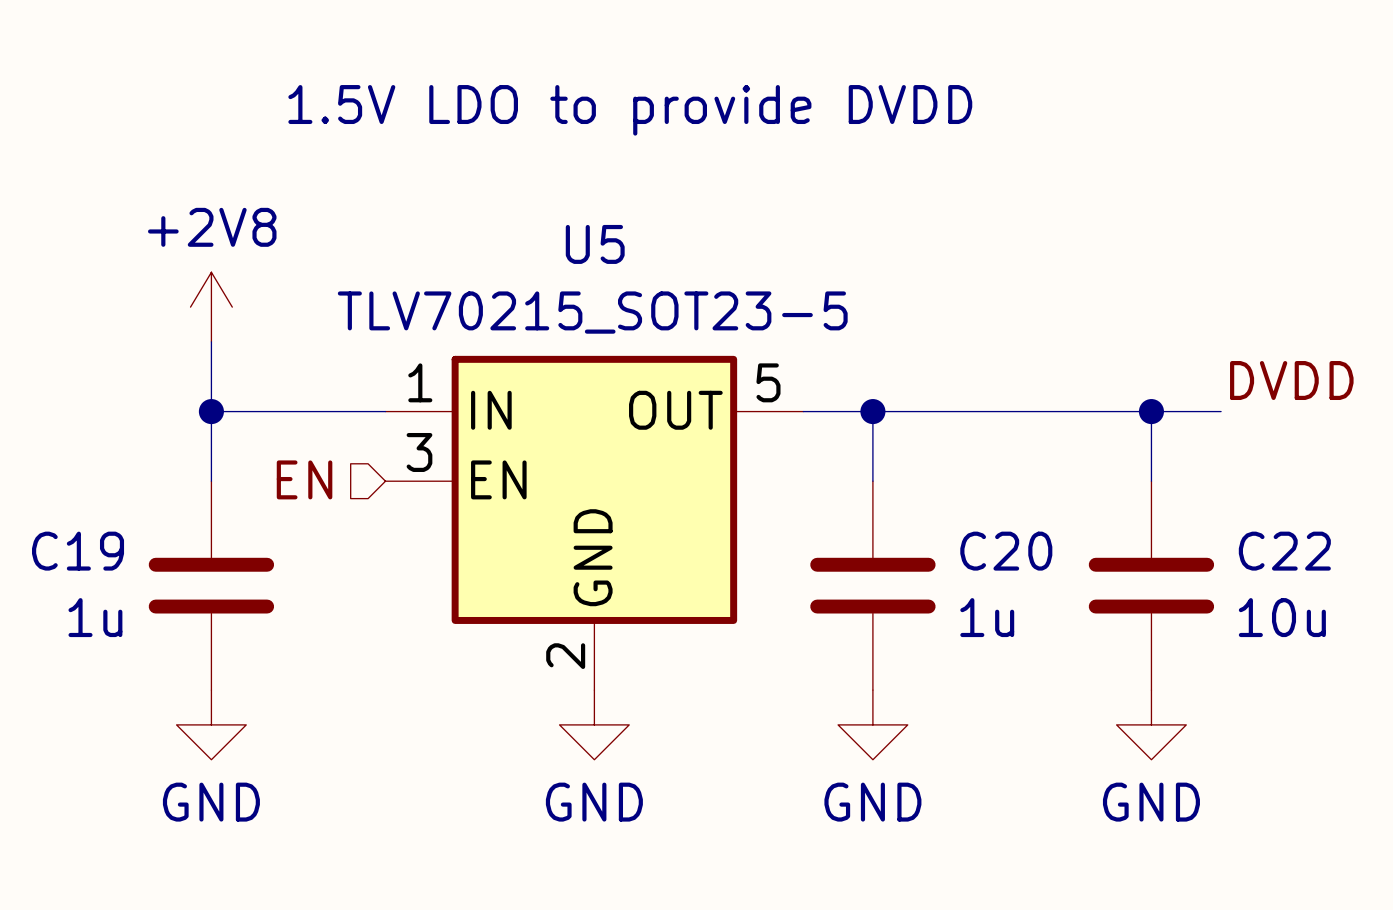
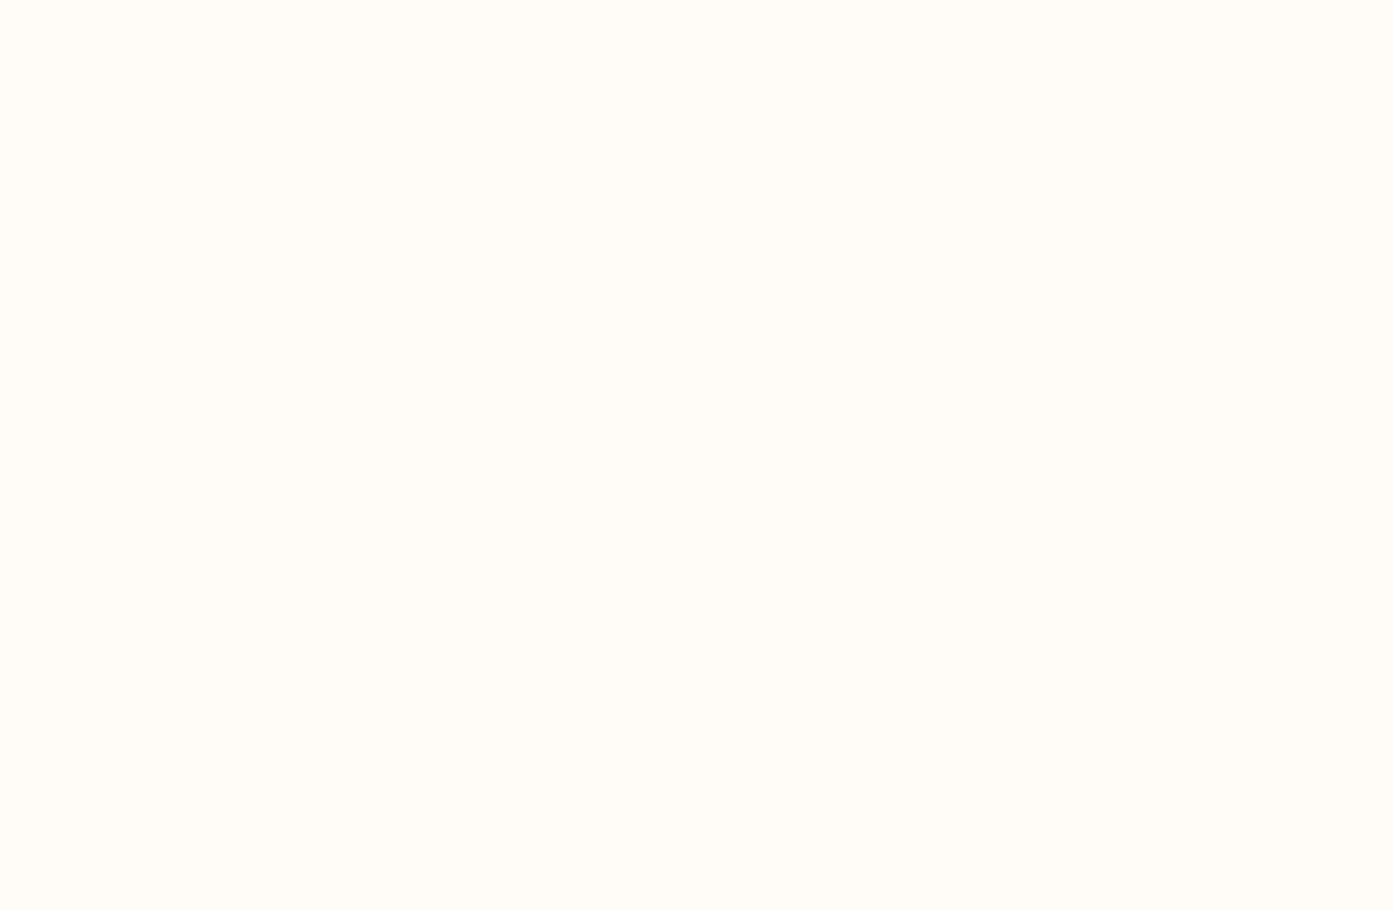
text: 1.5V LDO to provide DVDD (630, 110) -> none
power symbol: +2V8 (211, 307) -> none
wire: (211, 341) (211, 481) -> none
label: DVDD (1291, 380) -> none
wire: (211, 411) (385, 411) -> none
junction: (211, 411) -> none
wire: (803, 411) (1221, 411) -> none
wire: (872, 411) (872, 481) -> none
junction: (872, 411) -> none
wire: (1151, 411) (1151, 481) -> none
junction: (1151, 411) -> none
hierarchical label: EN (304, 479) -> none
U5: TLV70215_SOT23-5 (594, 522) -> none
C19: 1u (211, 585) -> none
C20: 1u (872, 585) -> none
C22: 10u (1151, 585) -> none
power symbol: GND (211, 724) -> none
power symbol: GND (594, 724) -> none
power symbol: GND (872, 724) -> none
power symbol: GND (1151, 724) -> none

